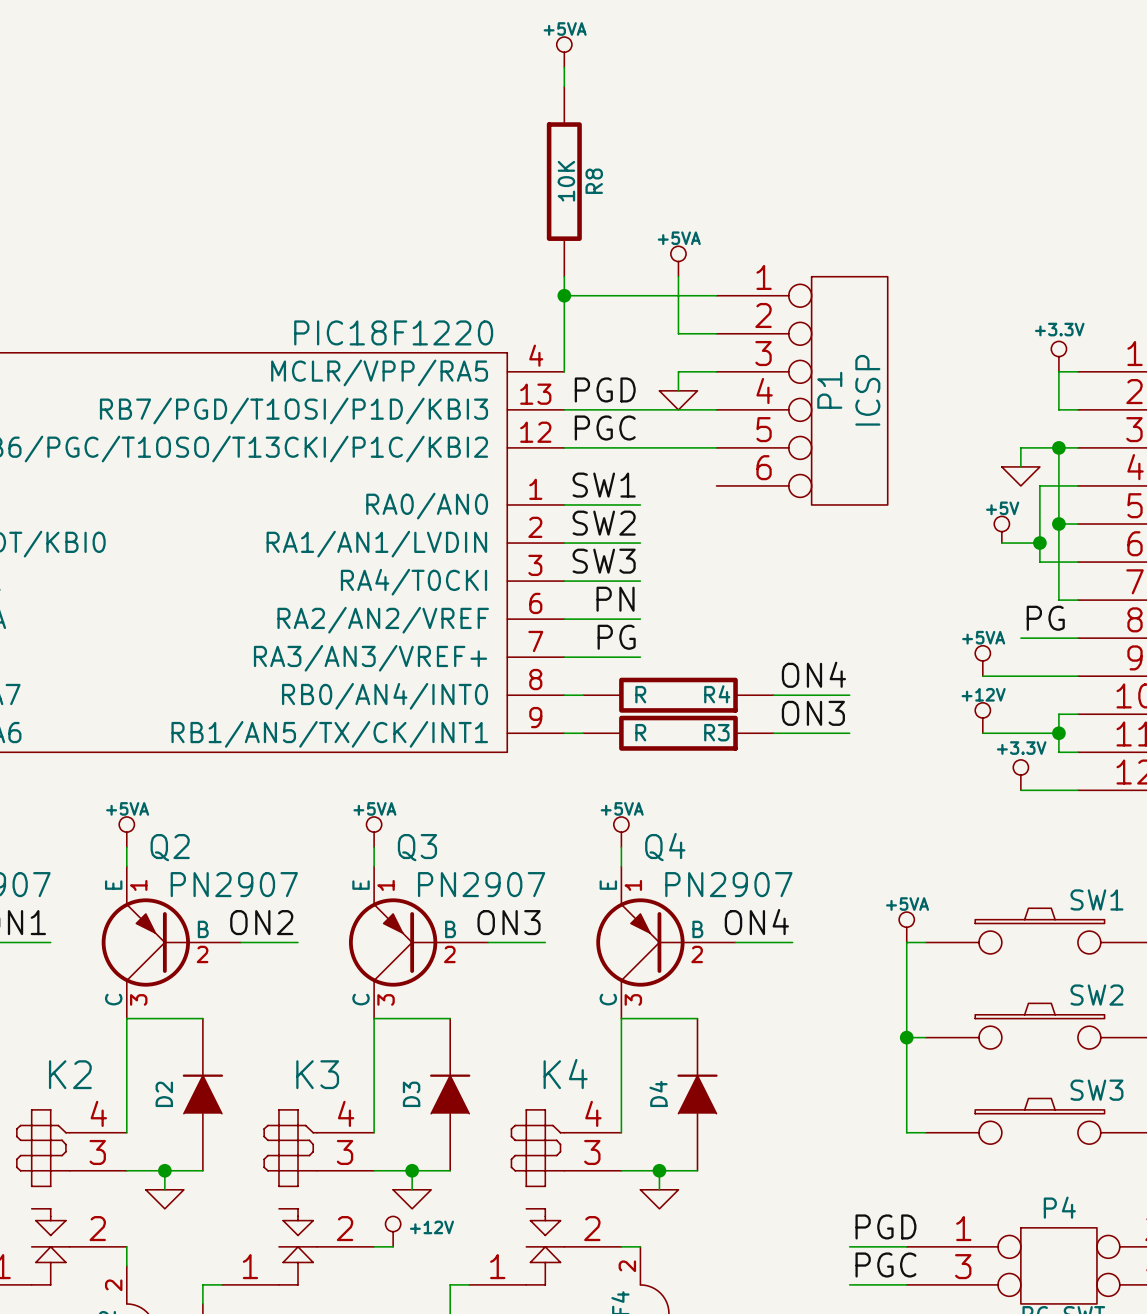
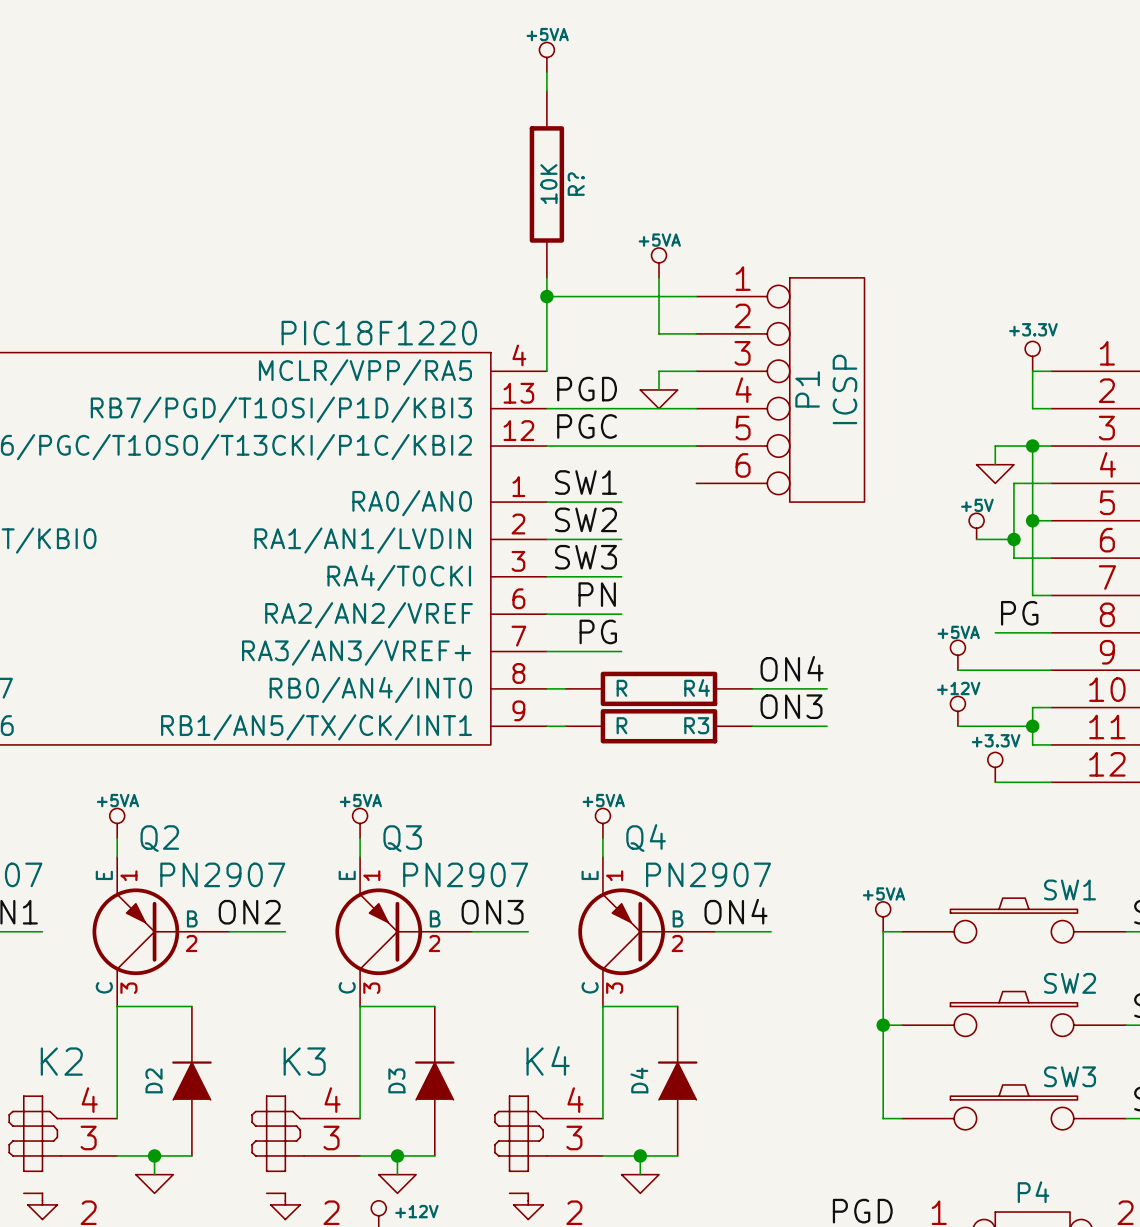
R8 name: R8 (594, 181) -> R? (576, 184)

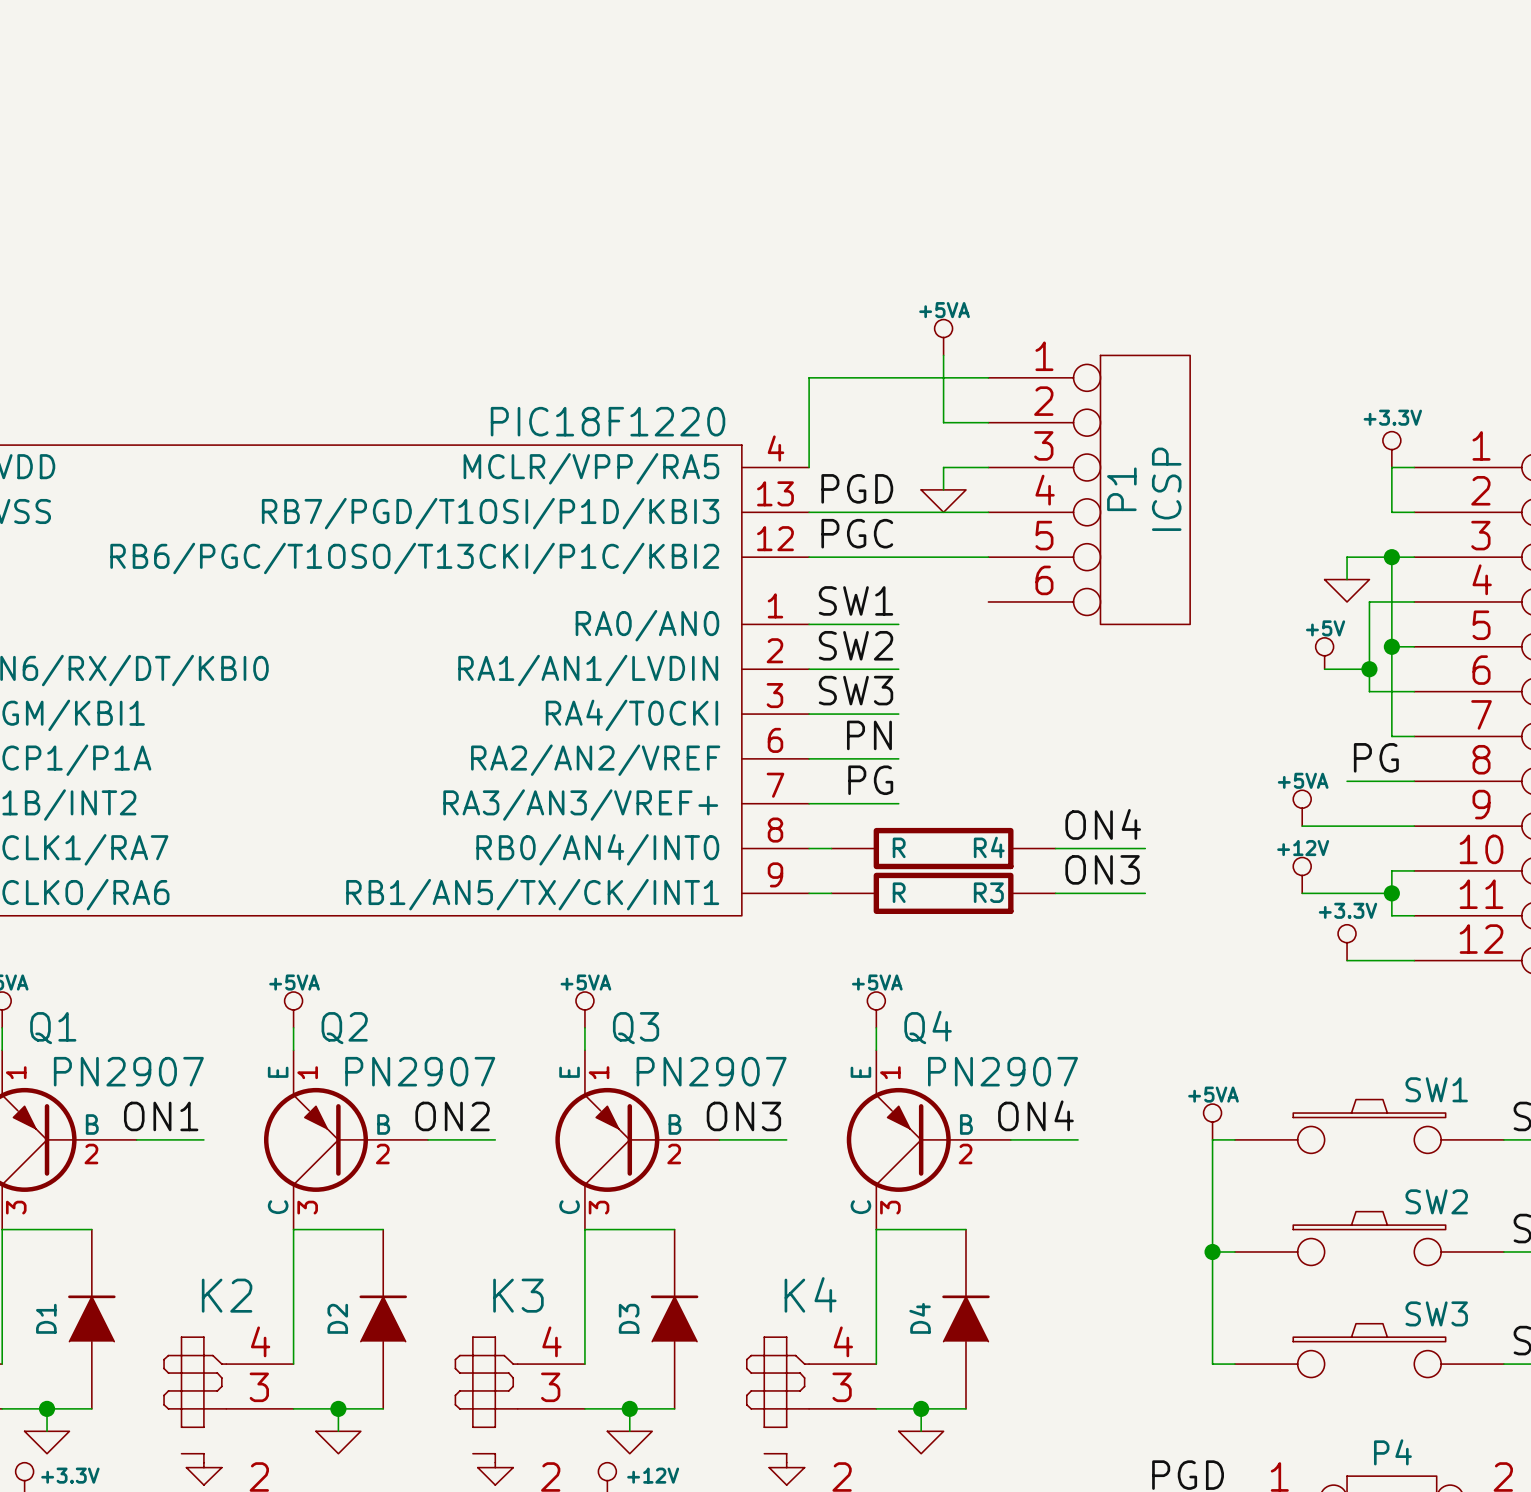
power symbol: +5VA (546, 57) -> none
wire: (546, 72) (546, 91) -> none
R?: 10K (546, 184) -> none
wire: (546, 277) (546, 296) -> none
junction: (546, 296) -> none

